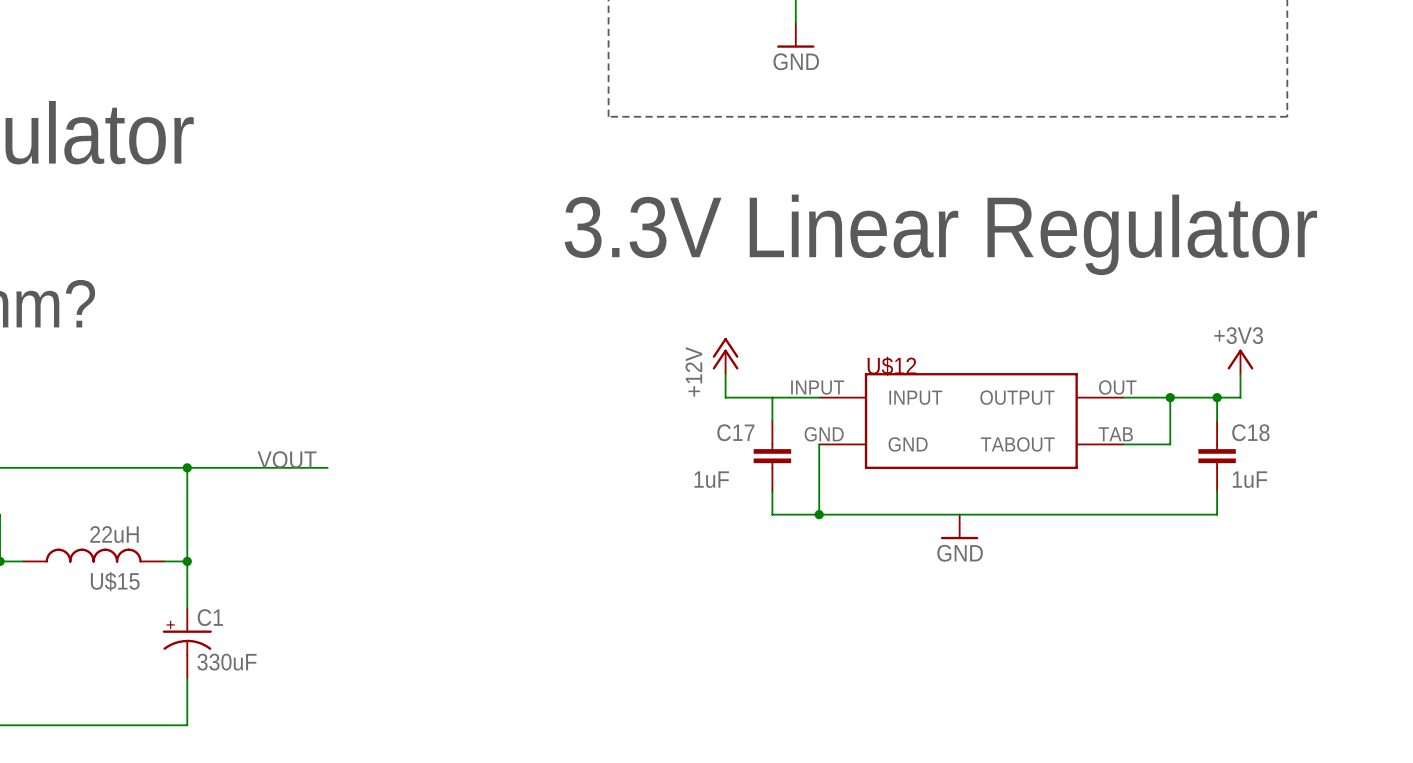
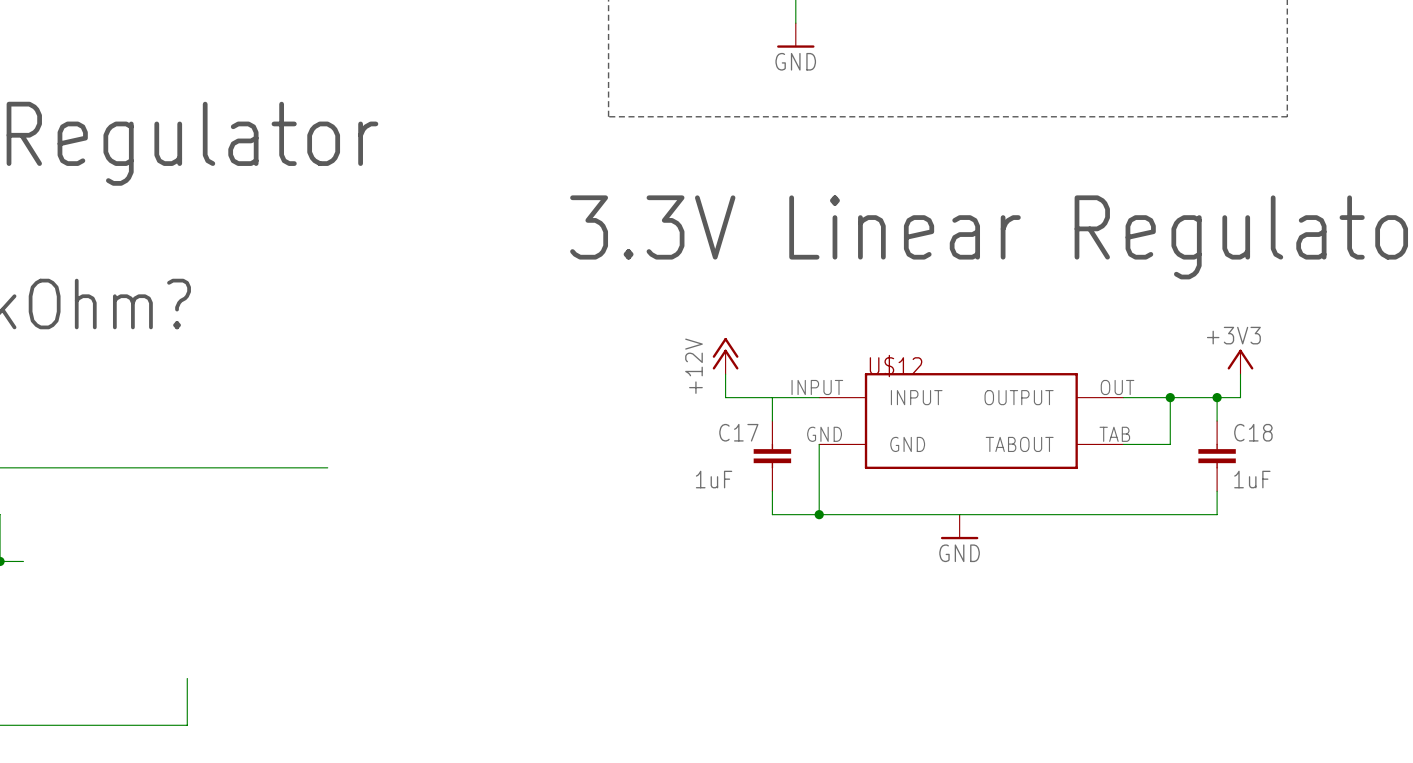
label: VOUT (287, 459) -> none
wire: (187, 467) (187, 608) -> none
junction: (187, 467) -> none
U$15: 22uH (93, 555) -> none
wire: (163, 561) (187, 561) -> none
junction: (187, 561) -> none
C1: 330uF (187, 643) -> none

